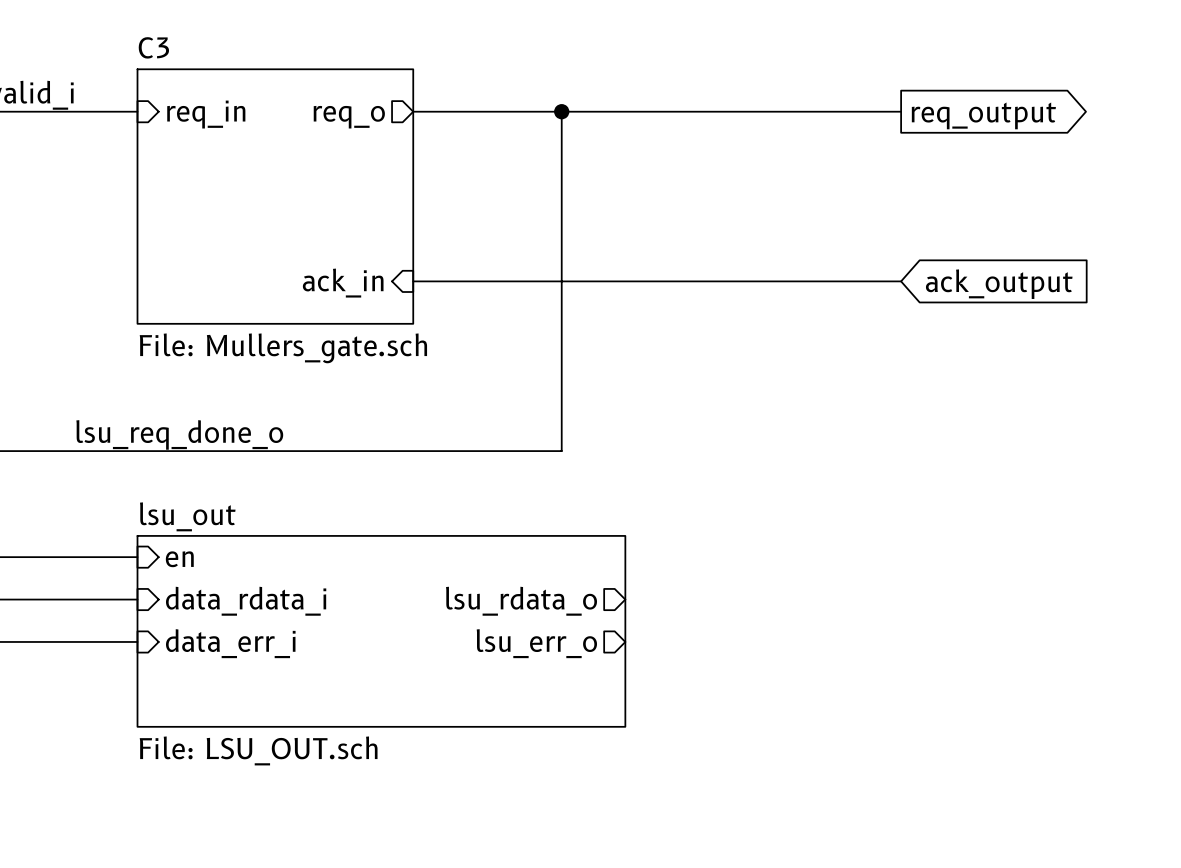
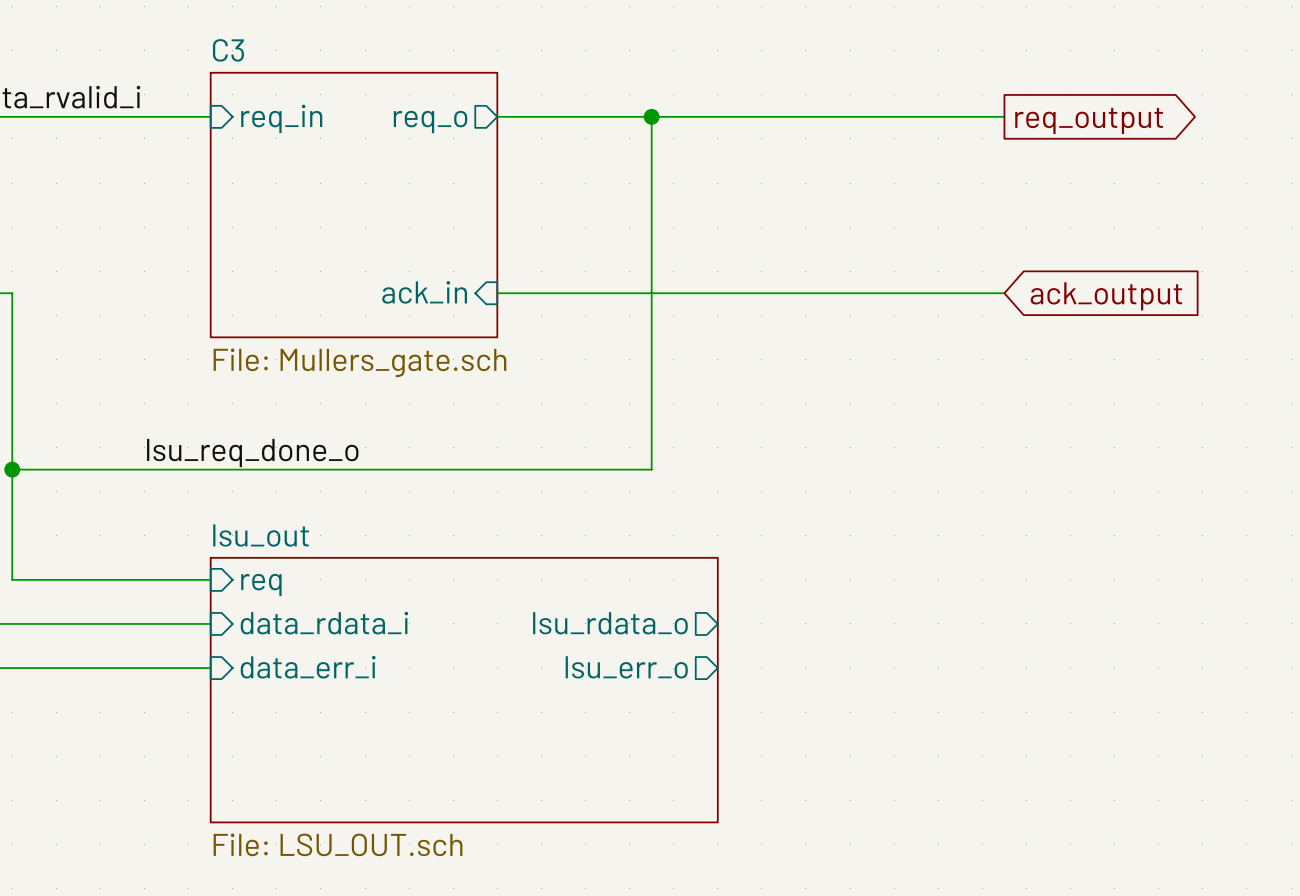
sheet pin: en (179, 559) -> req (261, 585)
sheet lsu_out: File: LSU_OUT.sch (381, 631) -> none
sheet lsu_out: none -> File: LSU_OUT.sch (464, 690)

